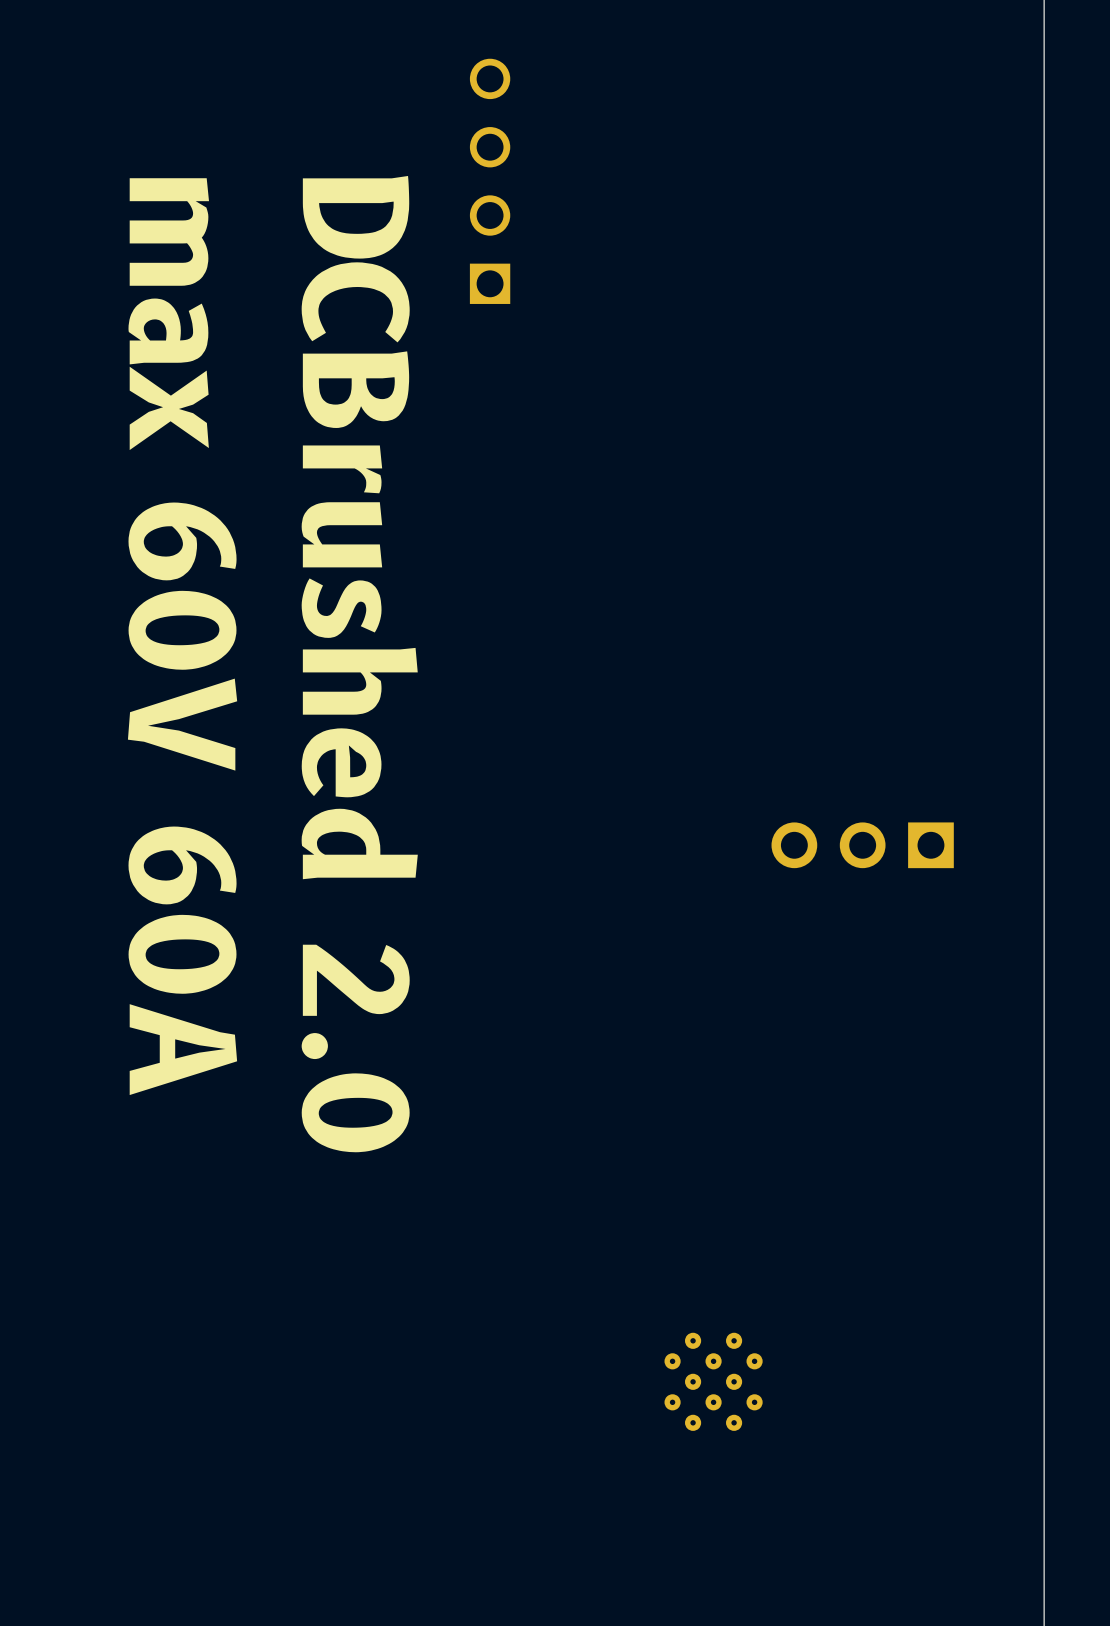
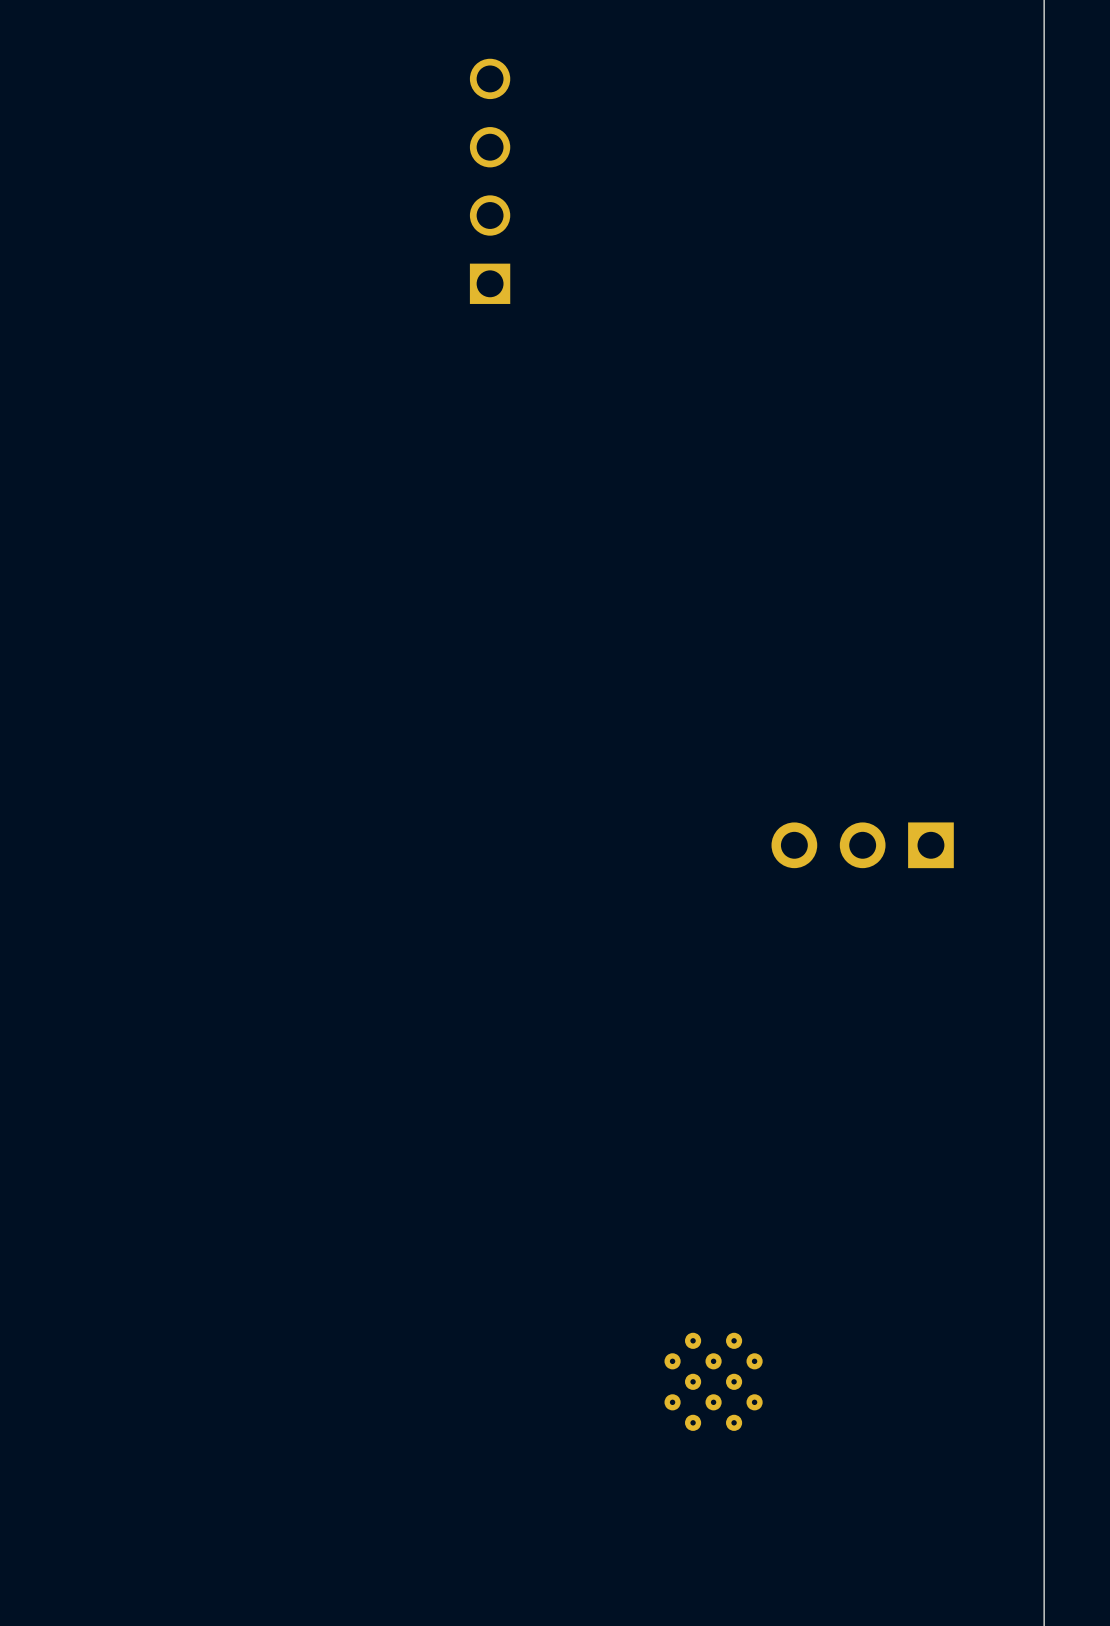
text: max 60V 60A (182, 636) -> none
text: DCBrushed 2.0 (359, 664) -> none

